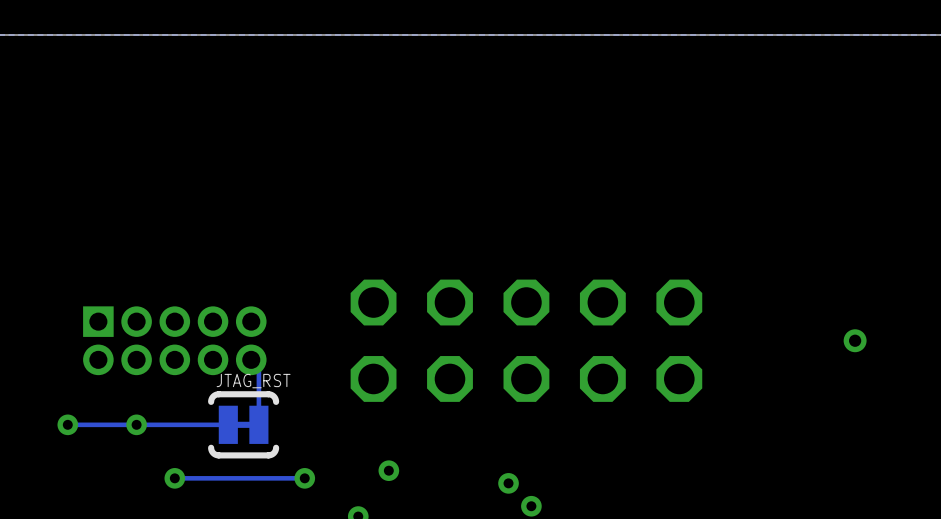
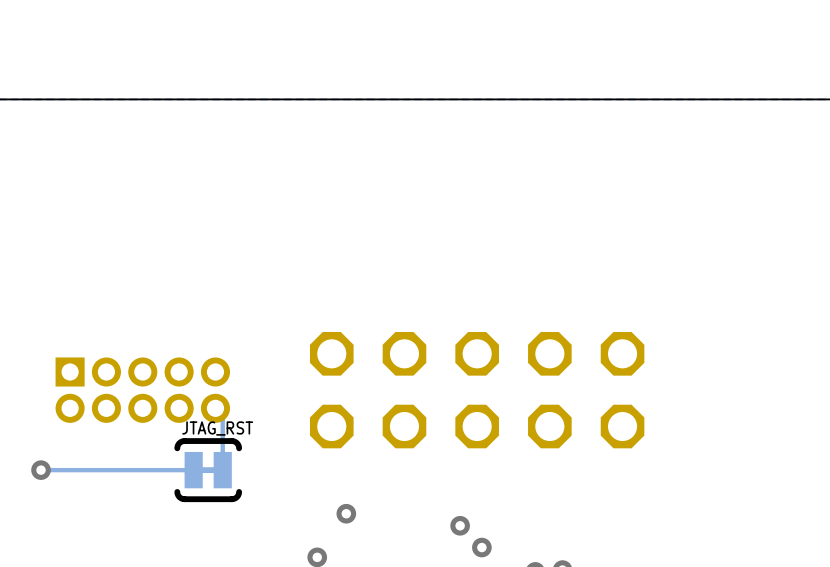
via: (855, 340) -> none
via: (136, 424) -> none
via: (174, 478) -> none
track: (304, 478) (174, 478) -> none
via: (304, 478) -> none

